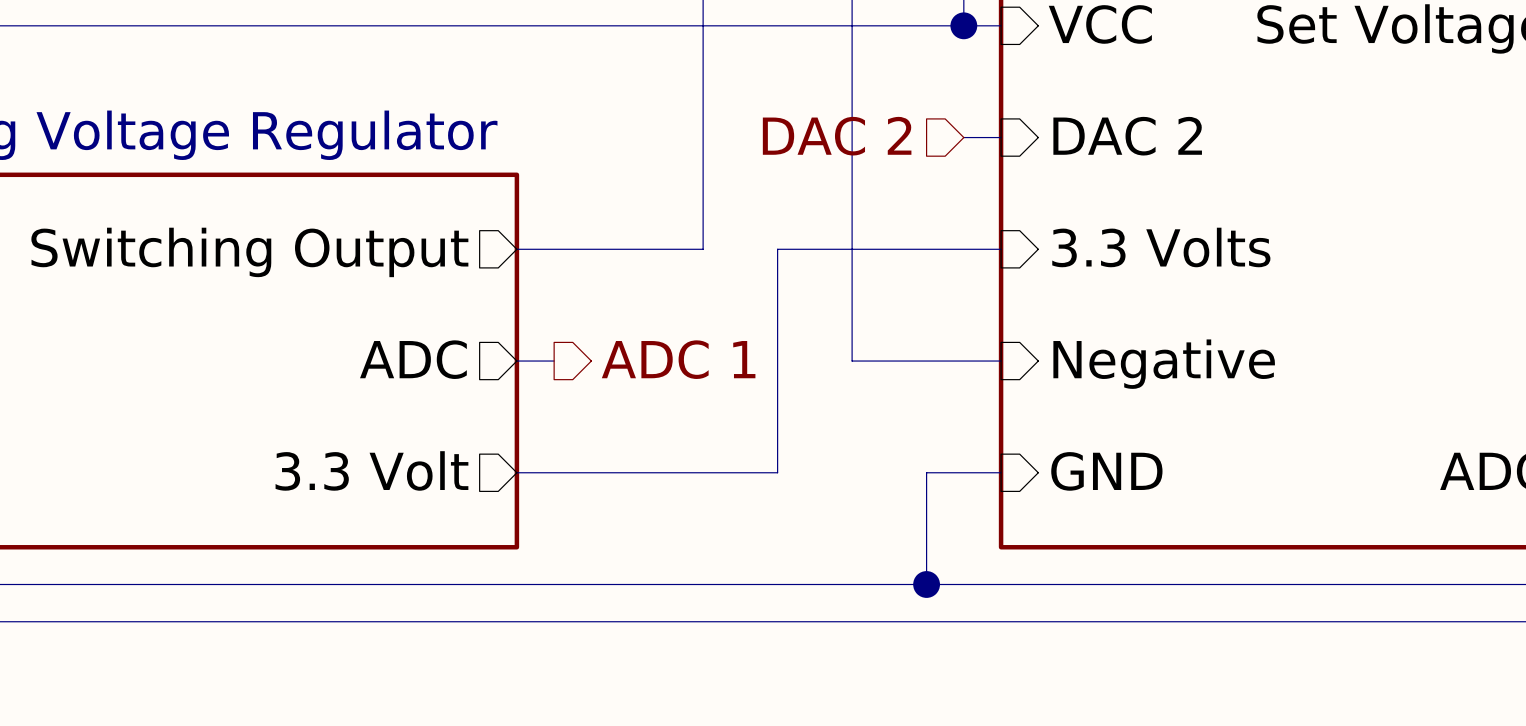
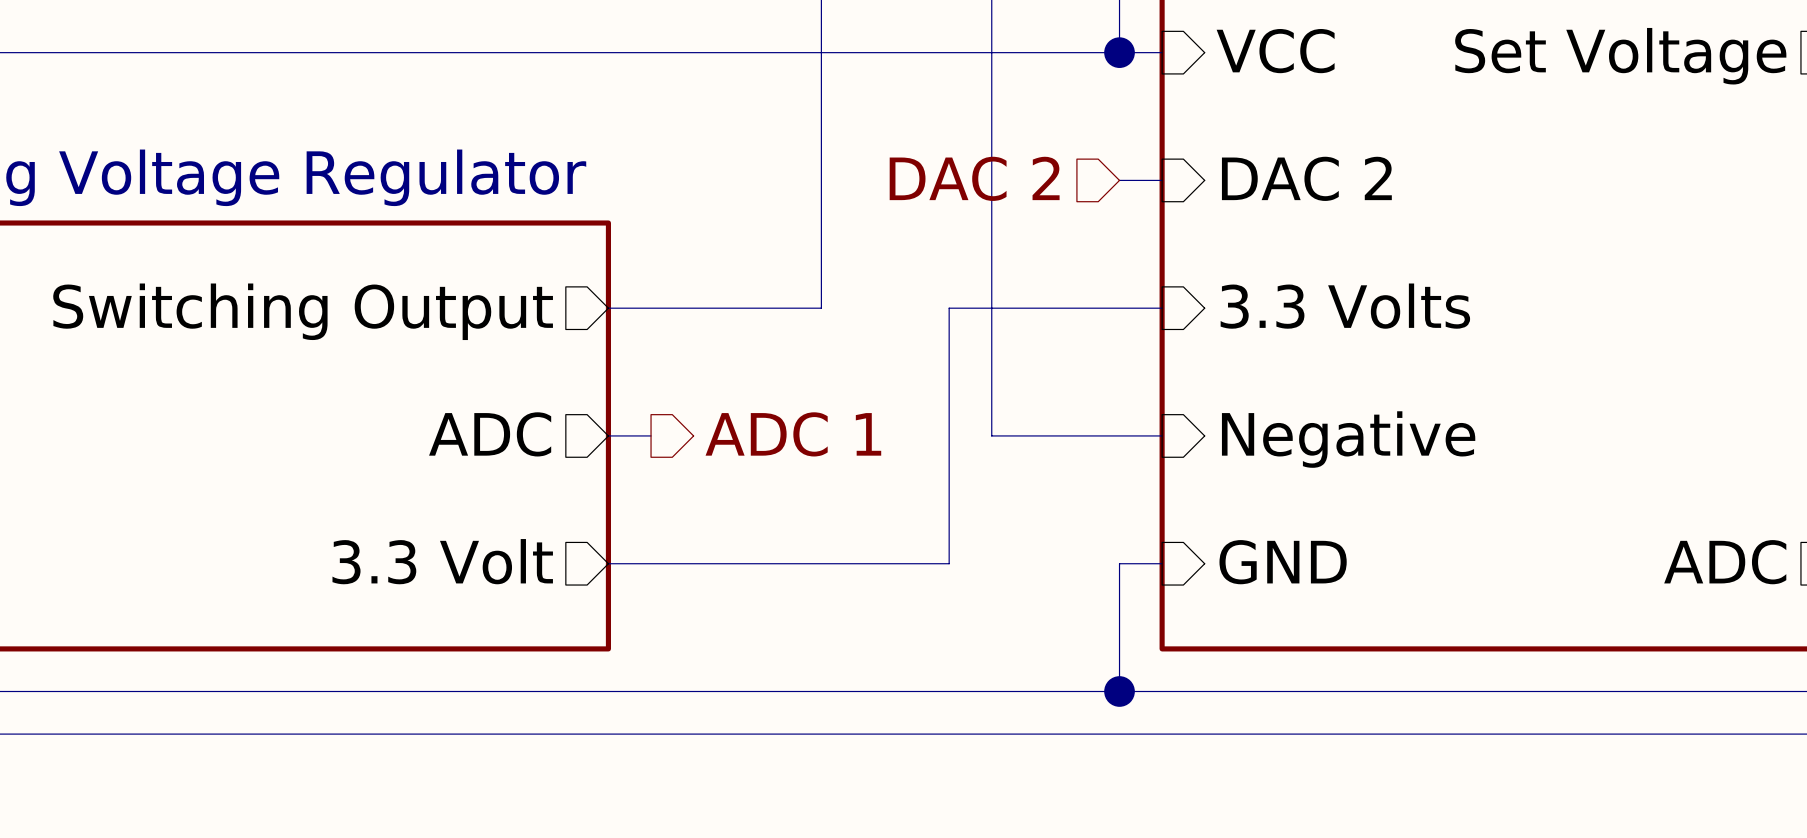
wire: (814, 249) (777, 249) (777, 472) -> (949, 308) (949, 563) (906, 563)
wire: (963, 472) (926, 472) (926, 584) -> (1119, 563) (1119, 691)
junction position: (926, 584) -> (1119, 691)

